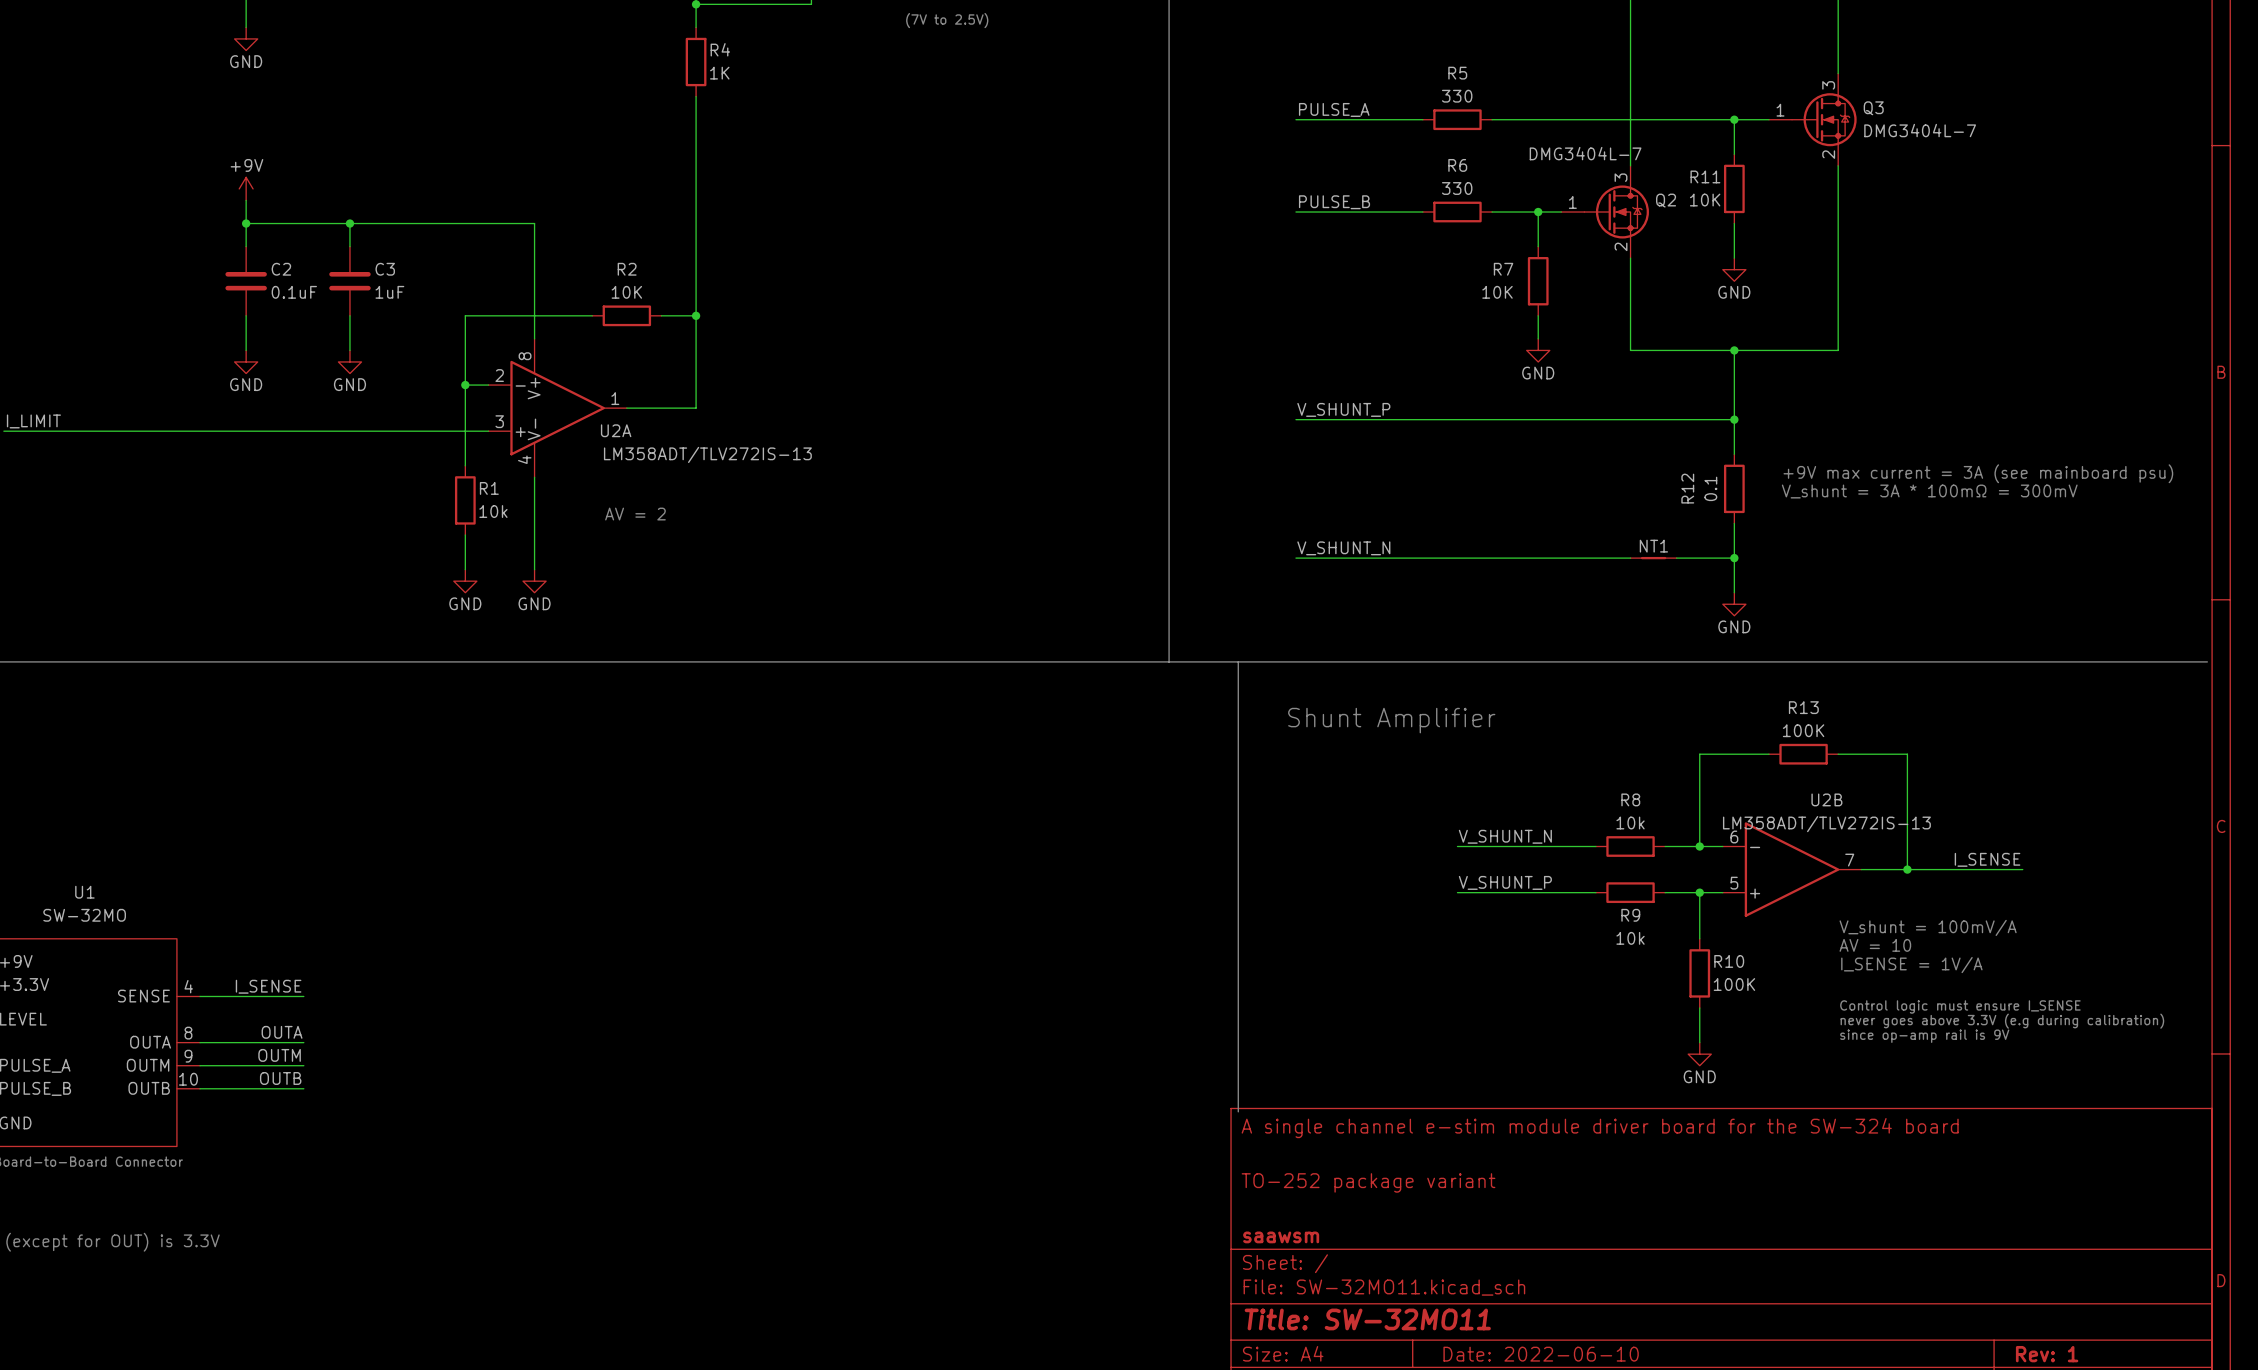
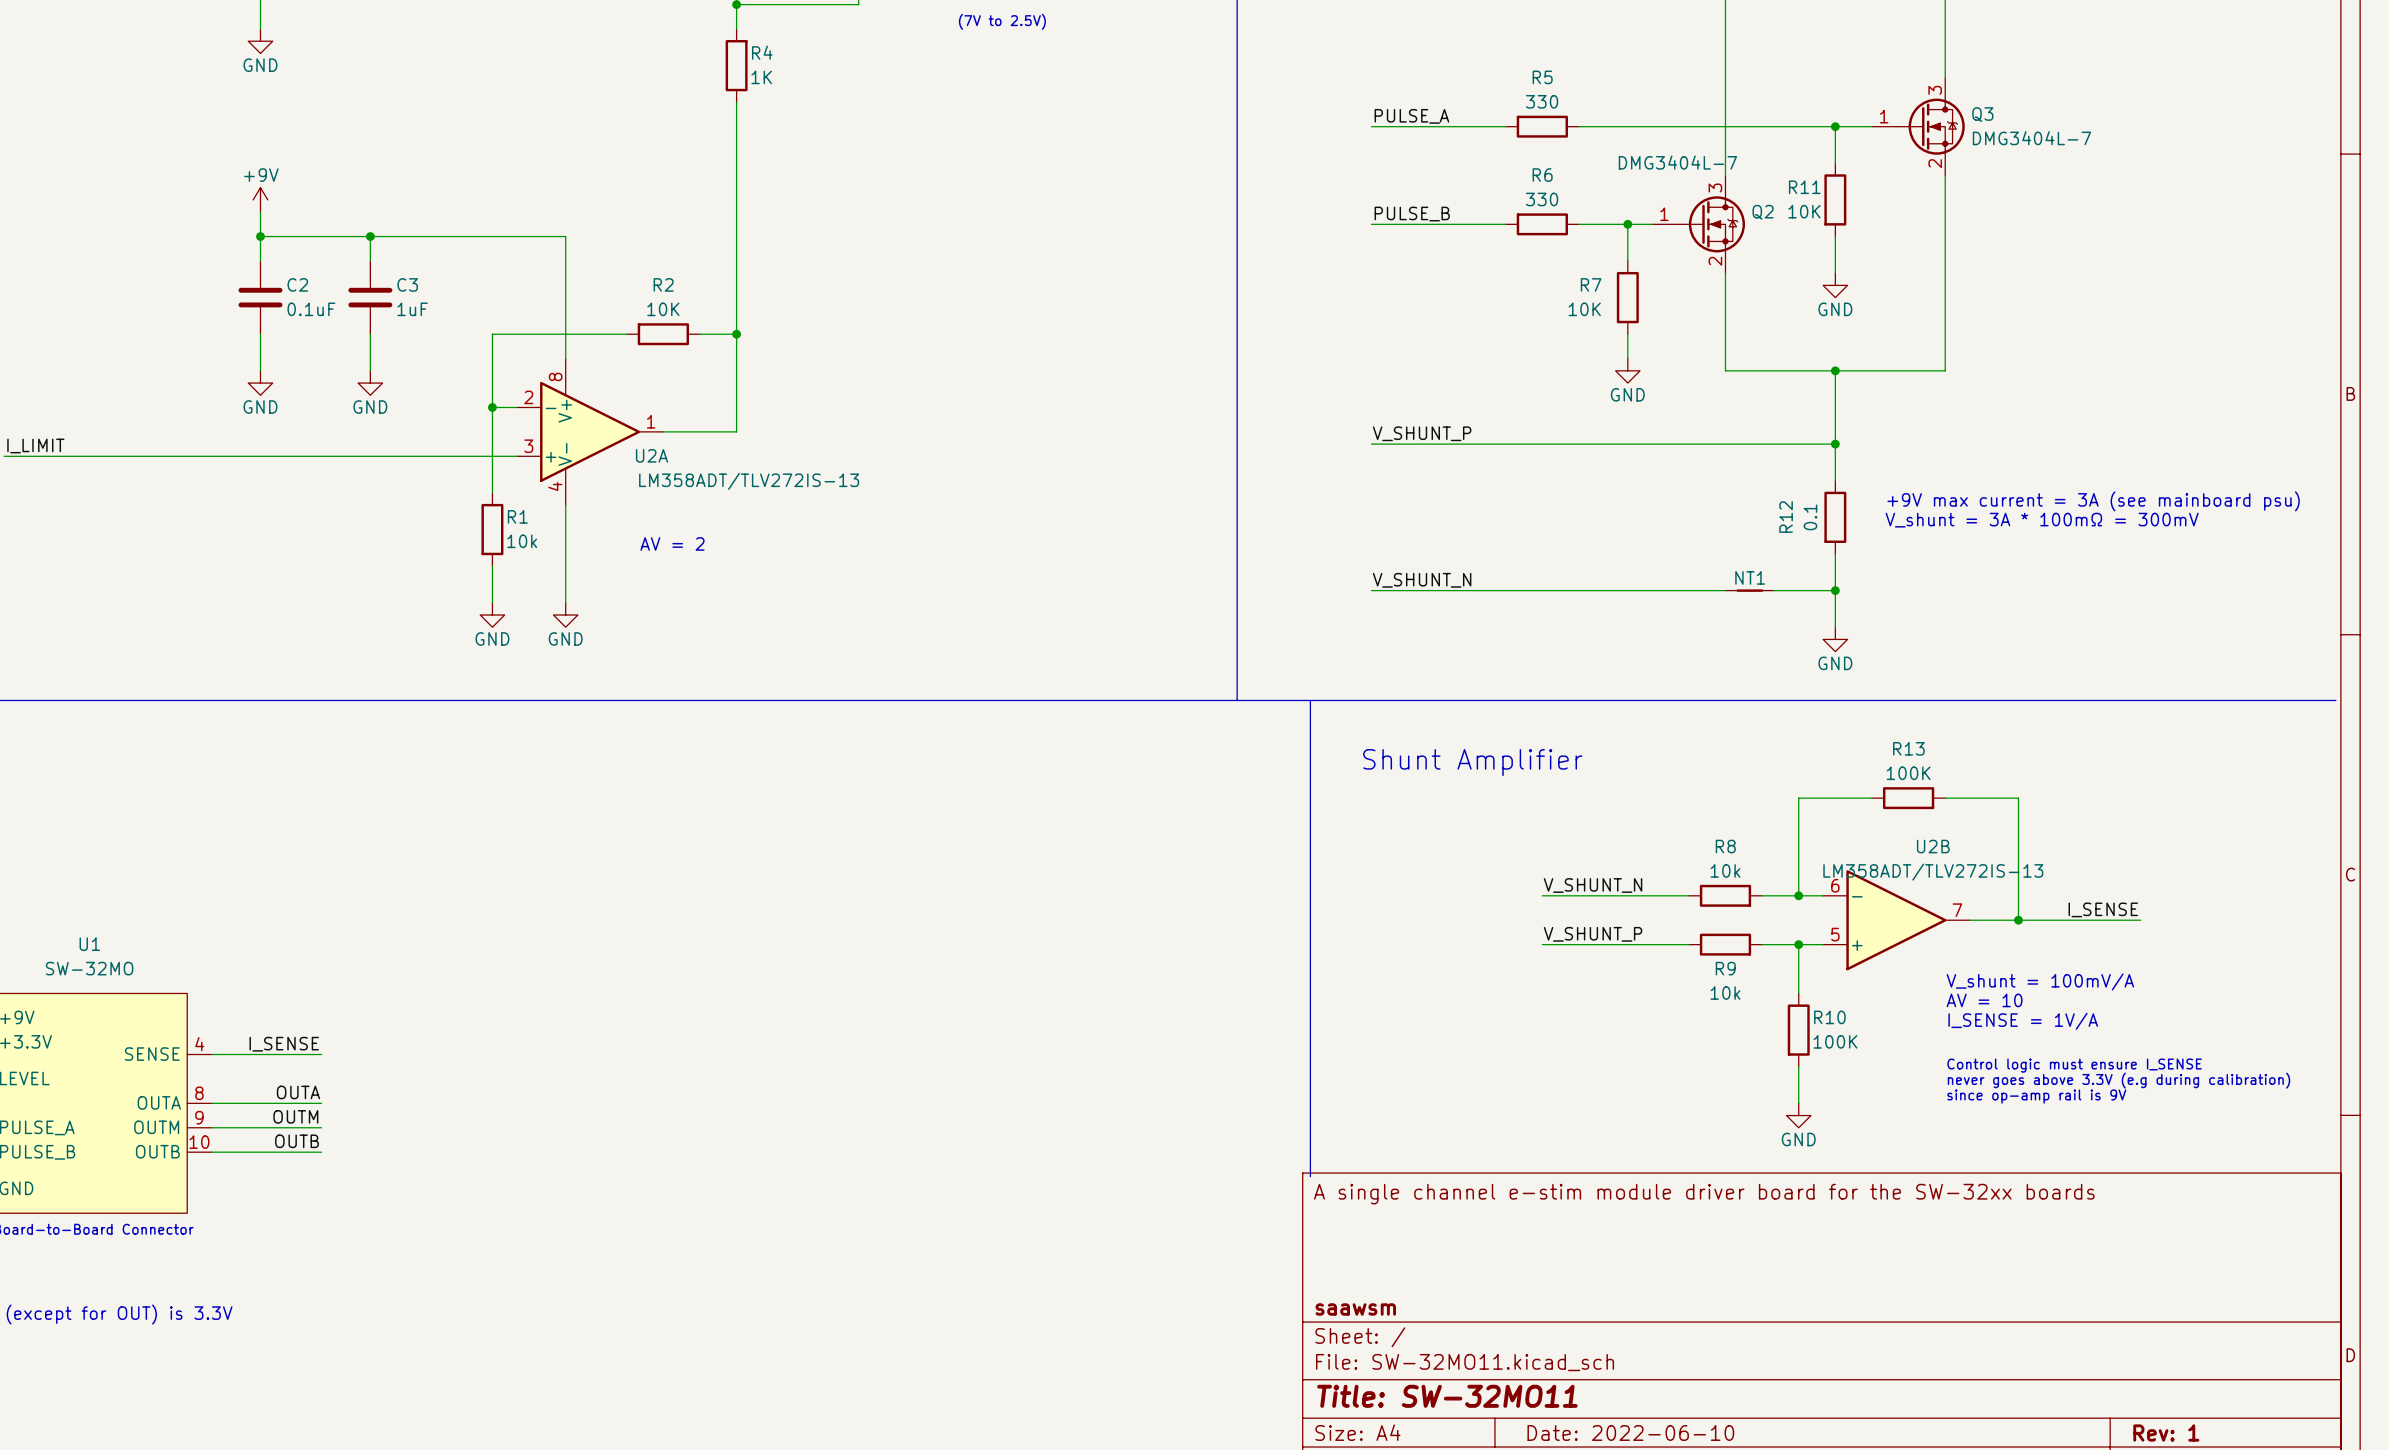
title block: A single channel e-stim module driver board for the SW-324 board (1600, 1128) -> A single channel e-stim module driver board for the SW-32xx boards (1704, 1194)
title block: TO-252 package variant (1368, 1182) -> none

